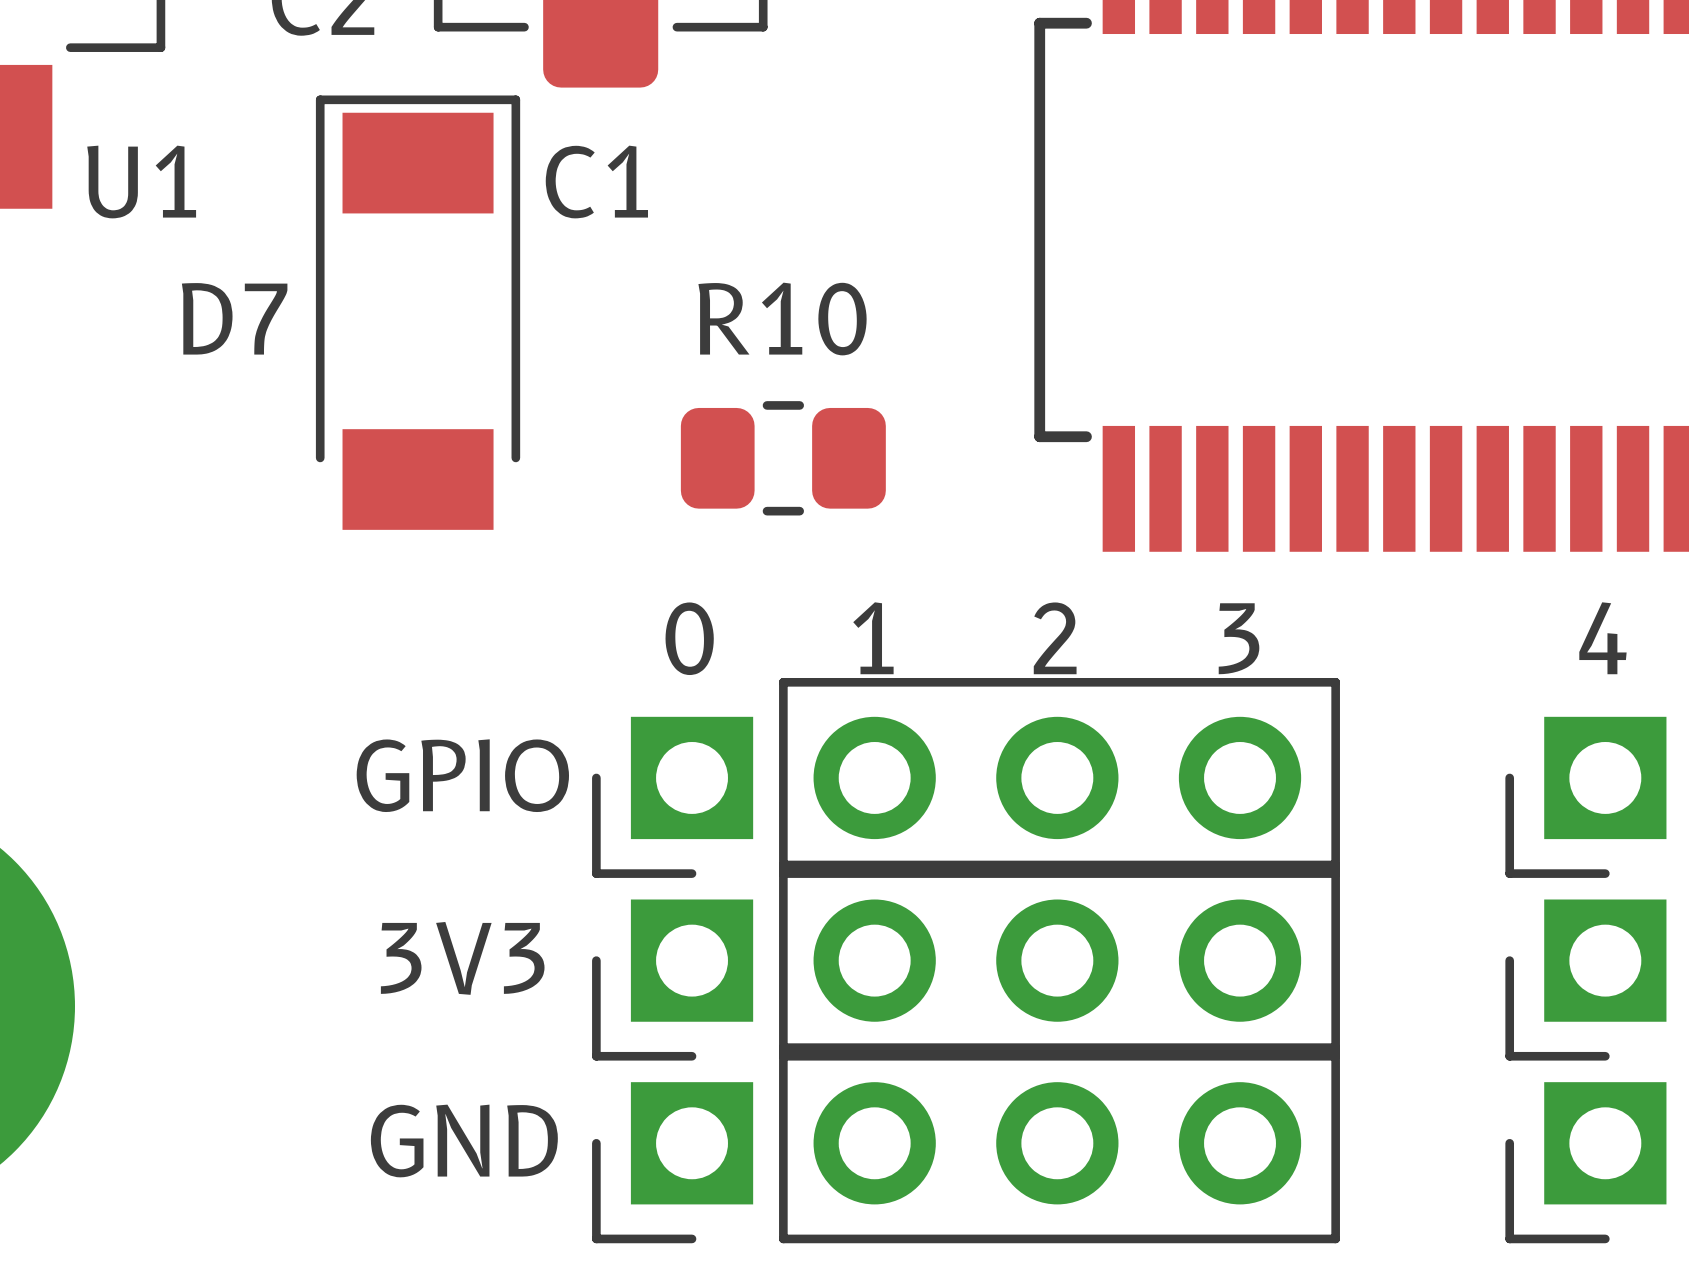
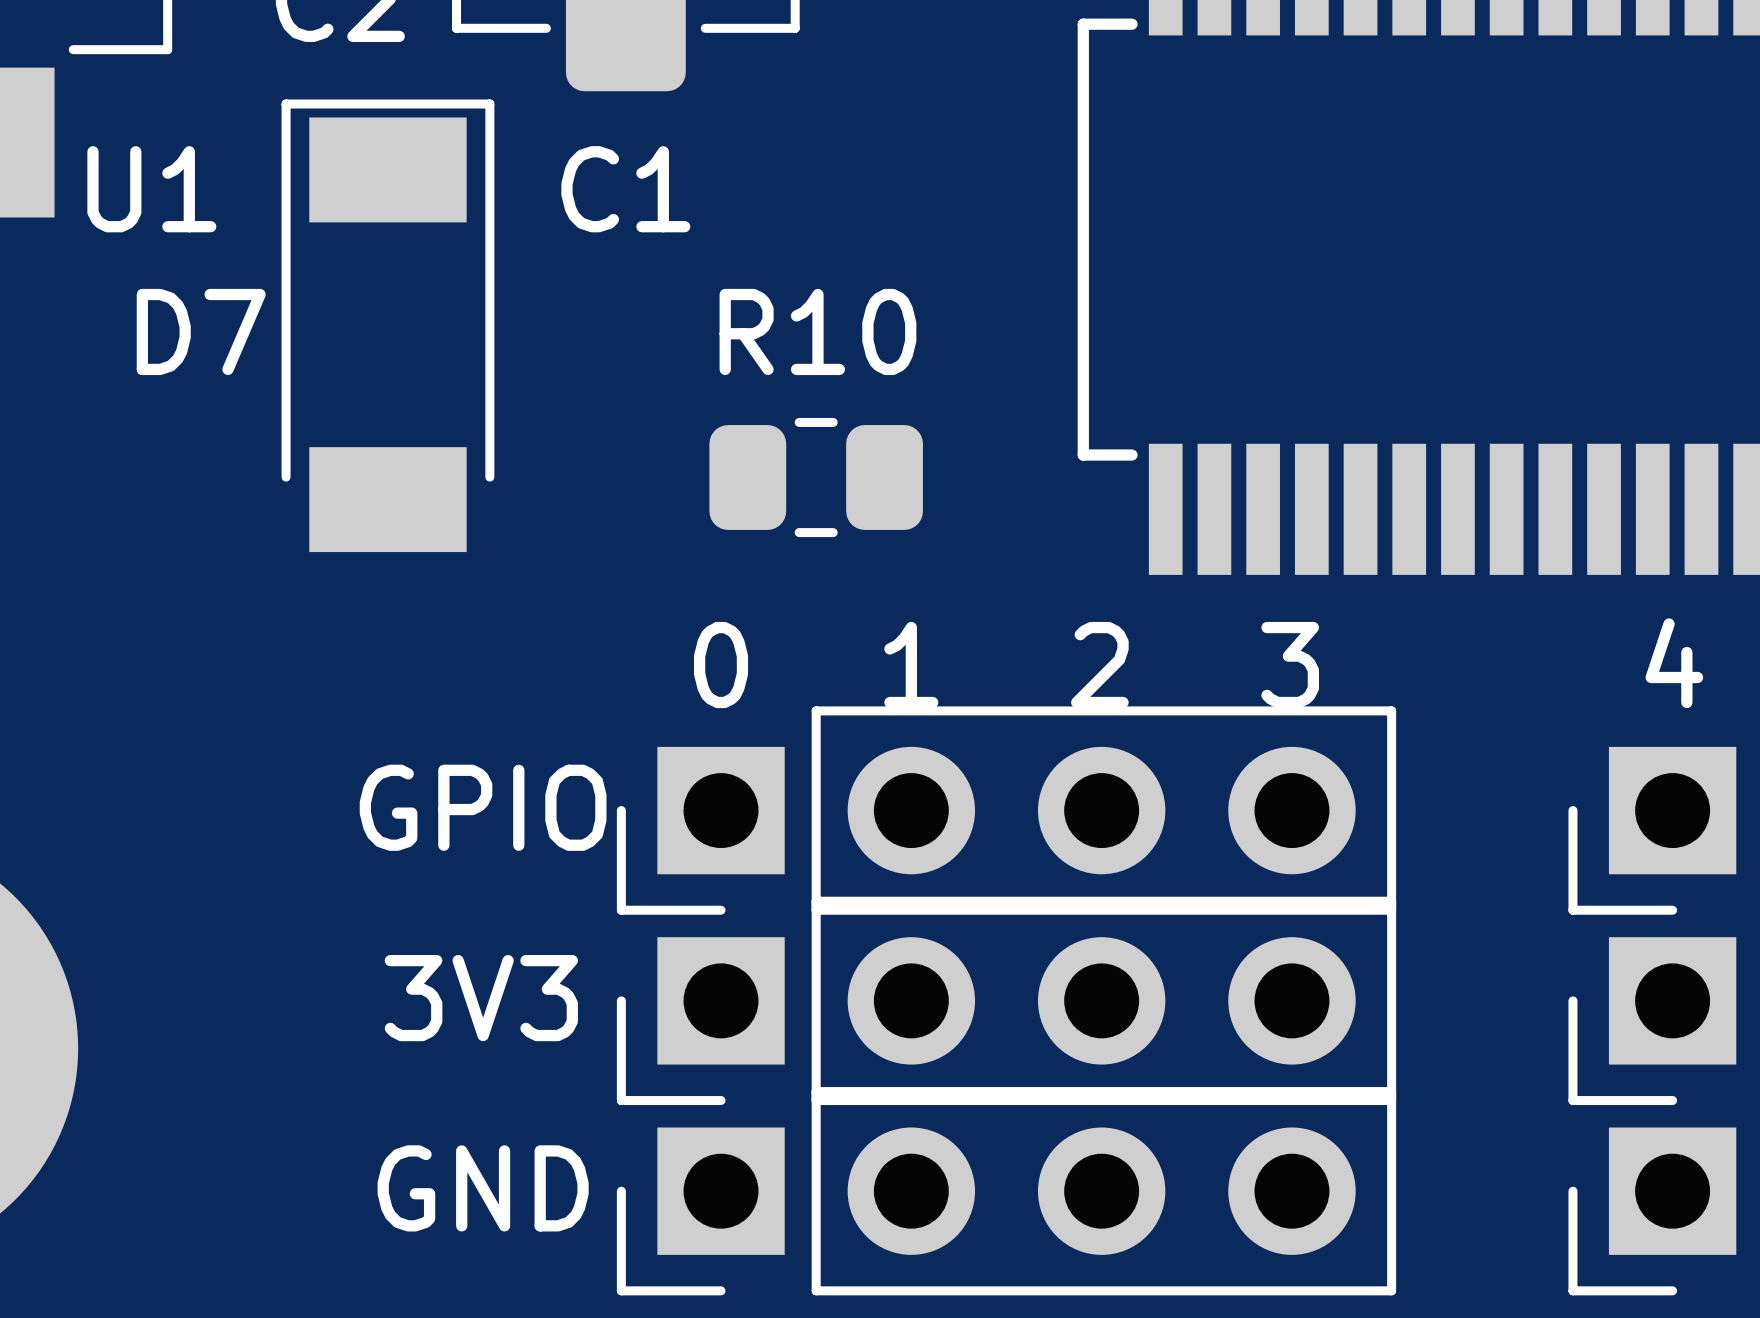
D7 position: (418, 312) -> (387, 325)

